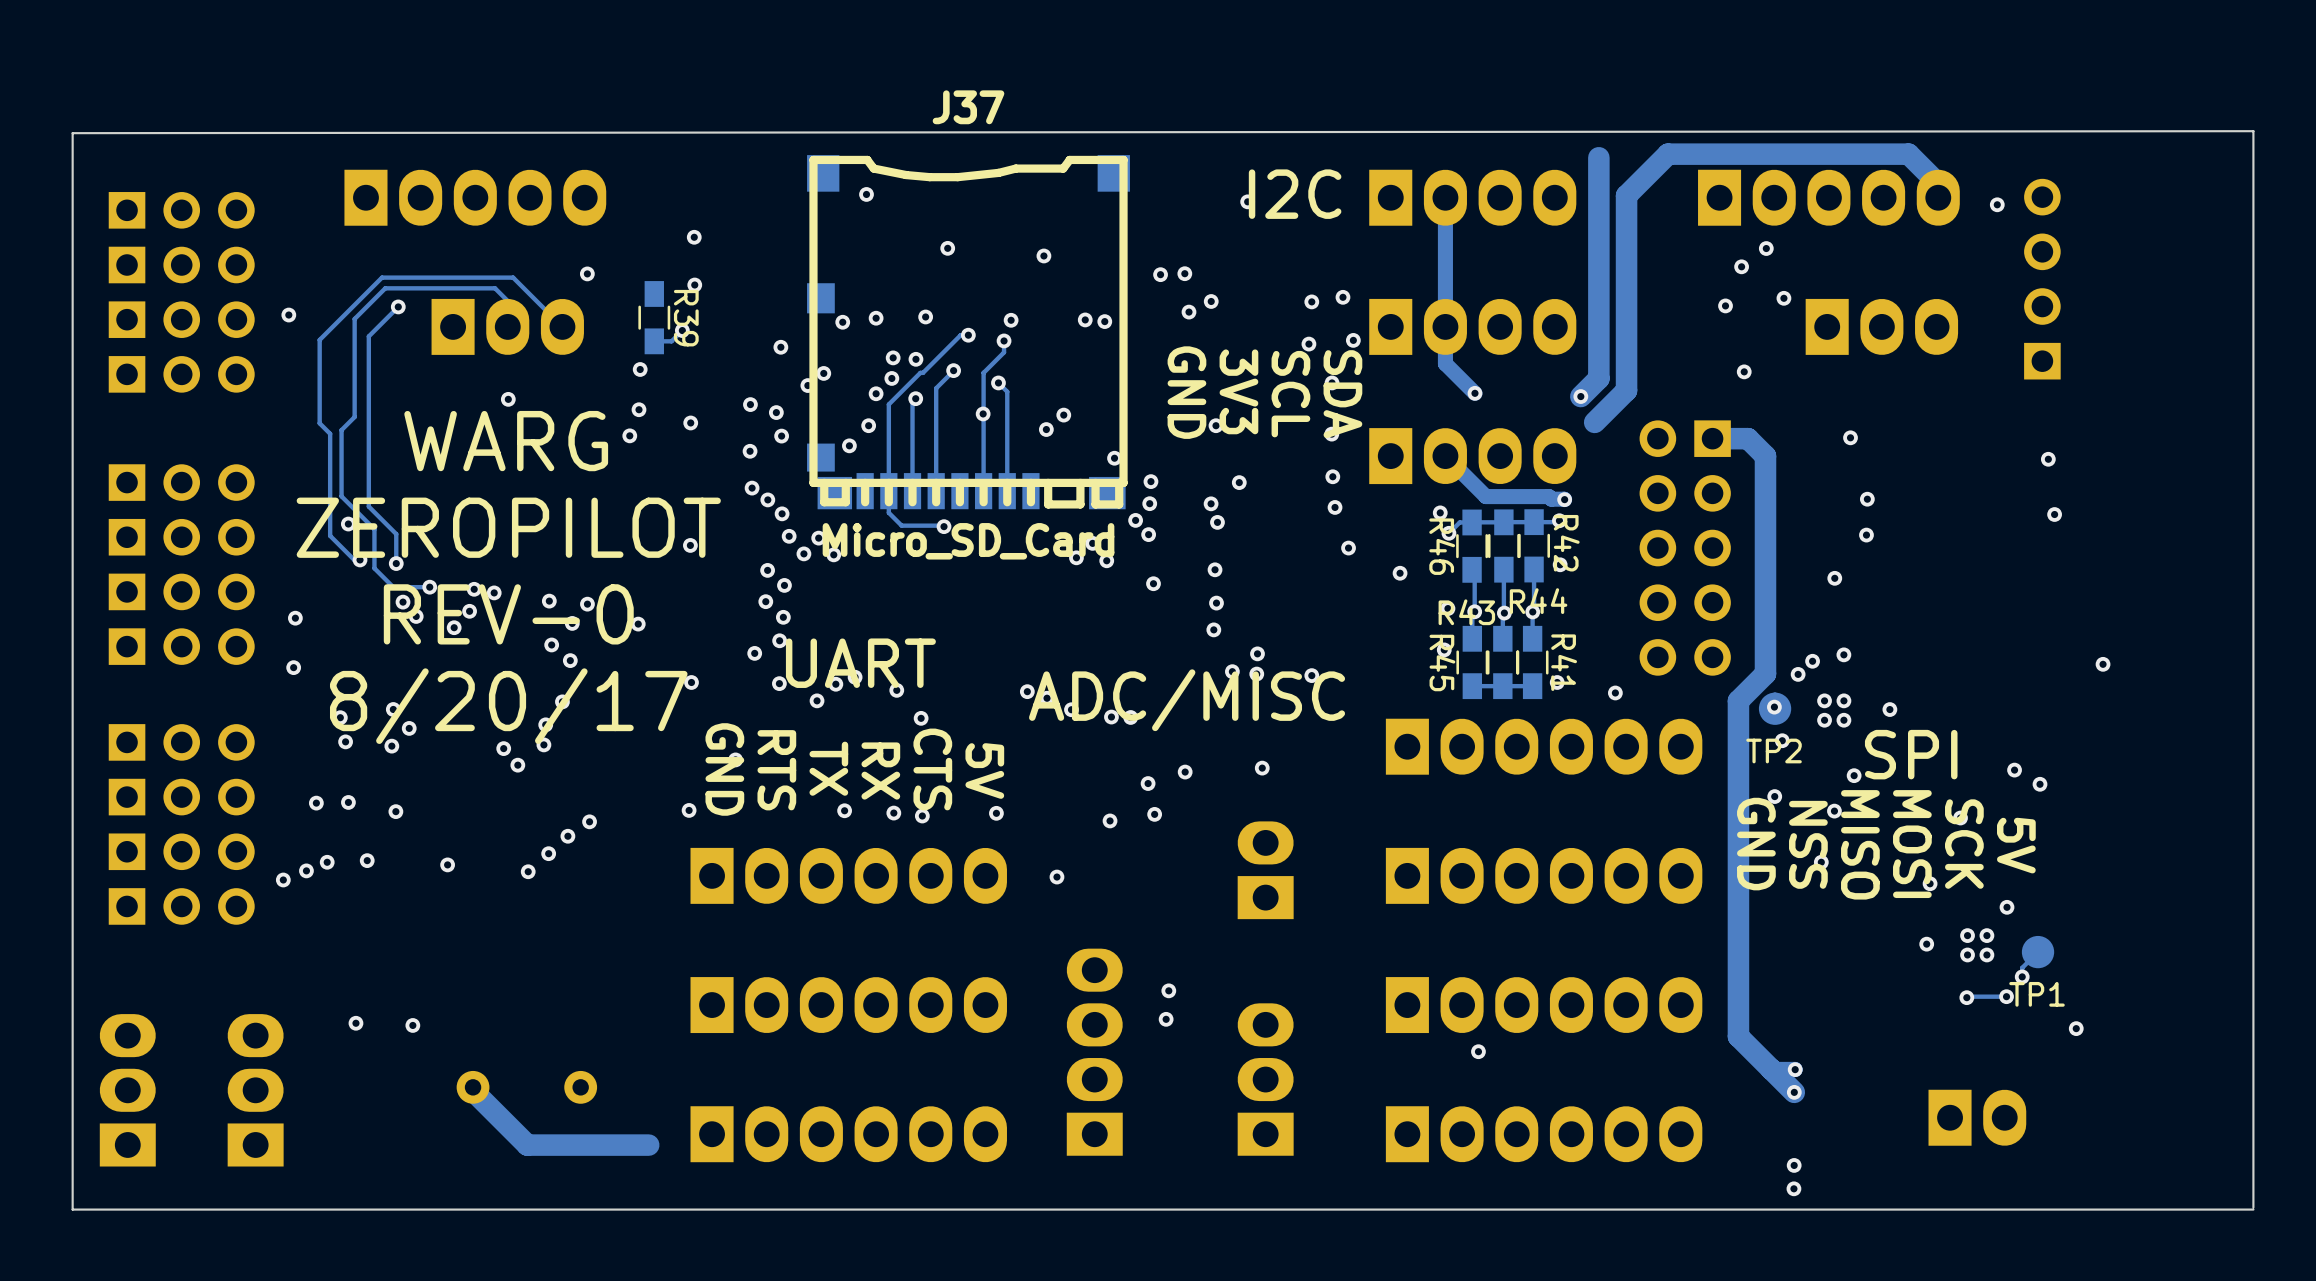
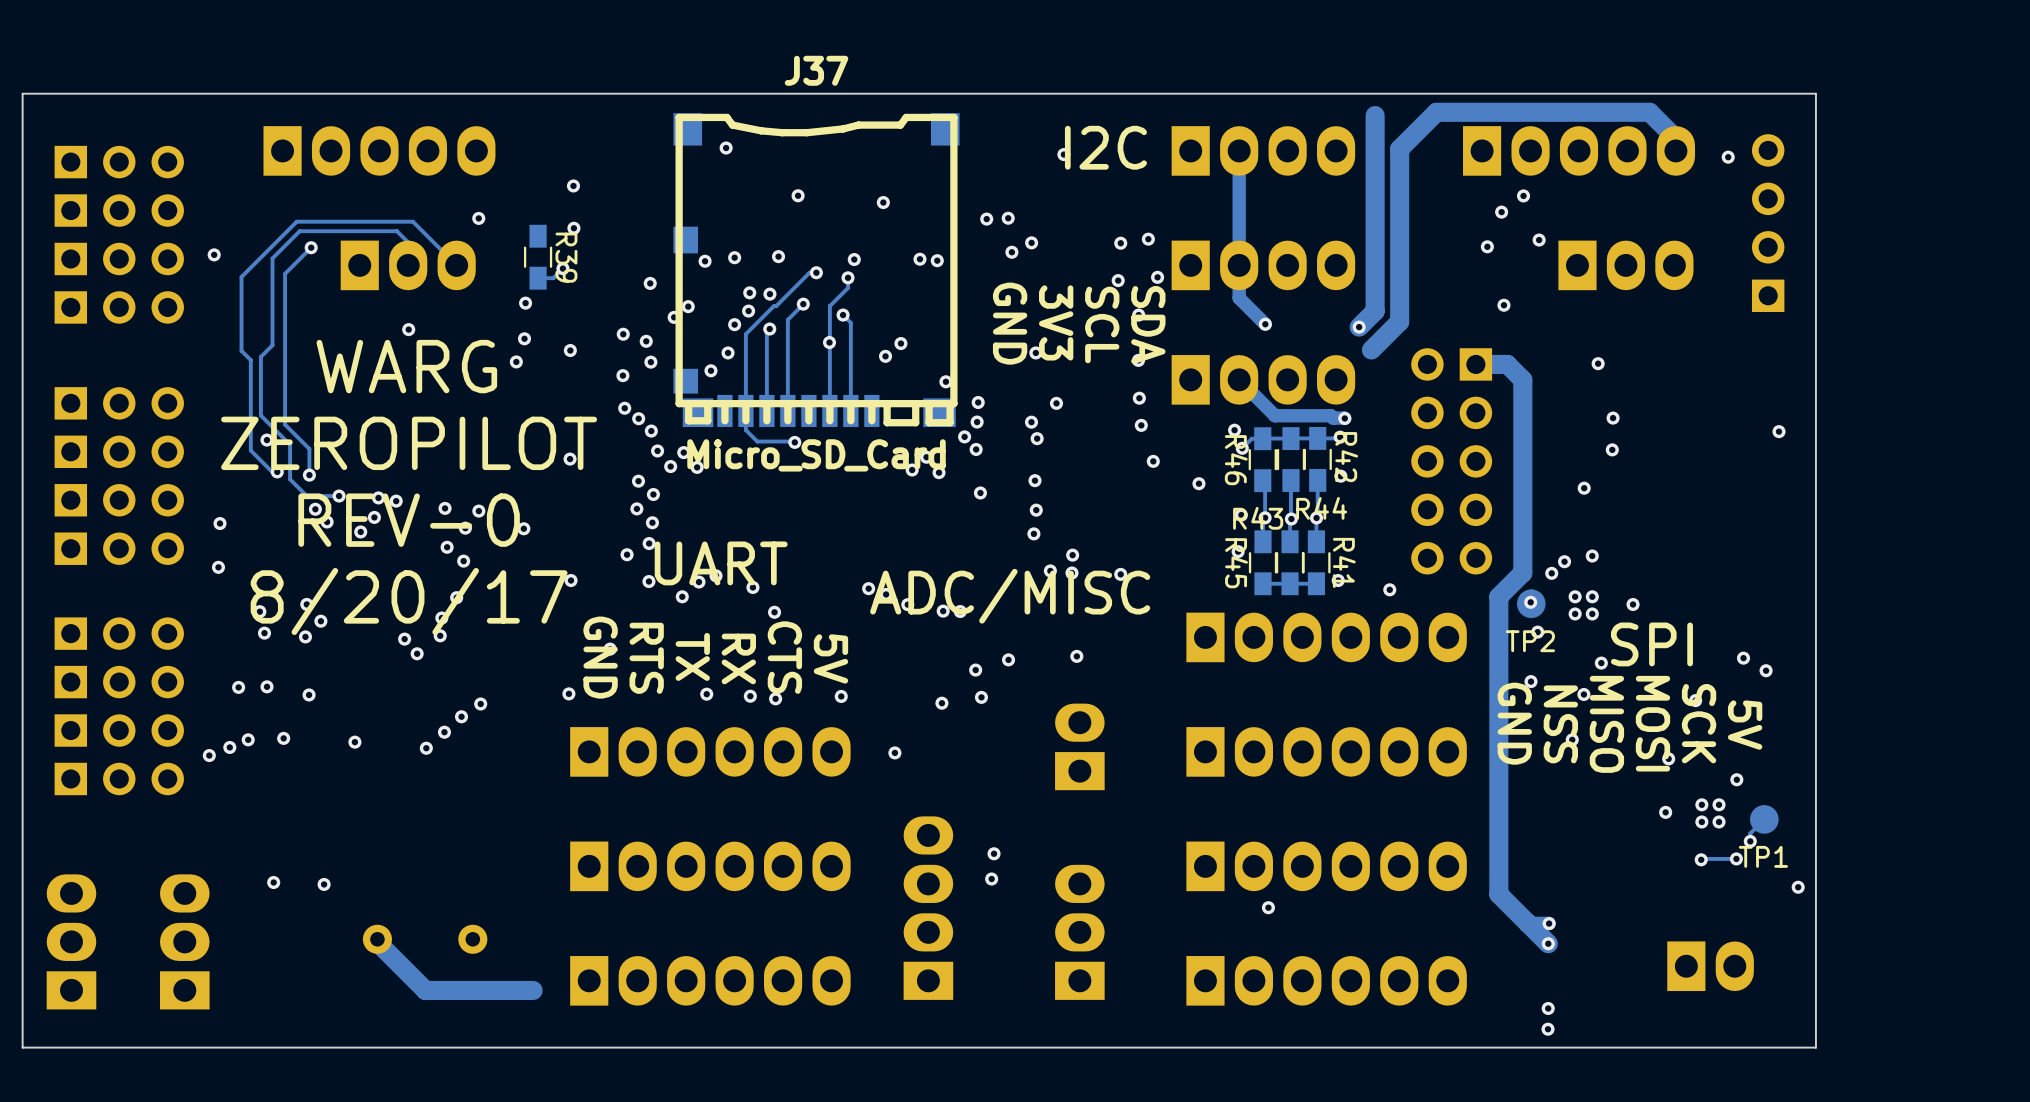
board edge: (72, 133) (2253, 131) (2253, 1207) -> (22, 93) (1815, 93) (1815, 1047)
via: (2048, 459) -> none
via: (2103, 664) -> none
board edge: (2253, 1209) (2096, 1209) -> none

